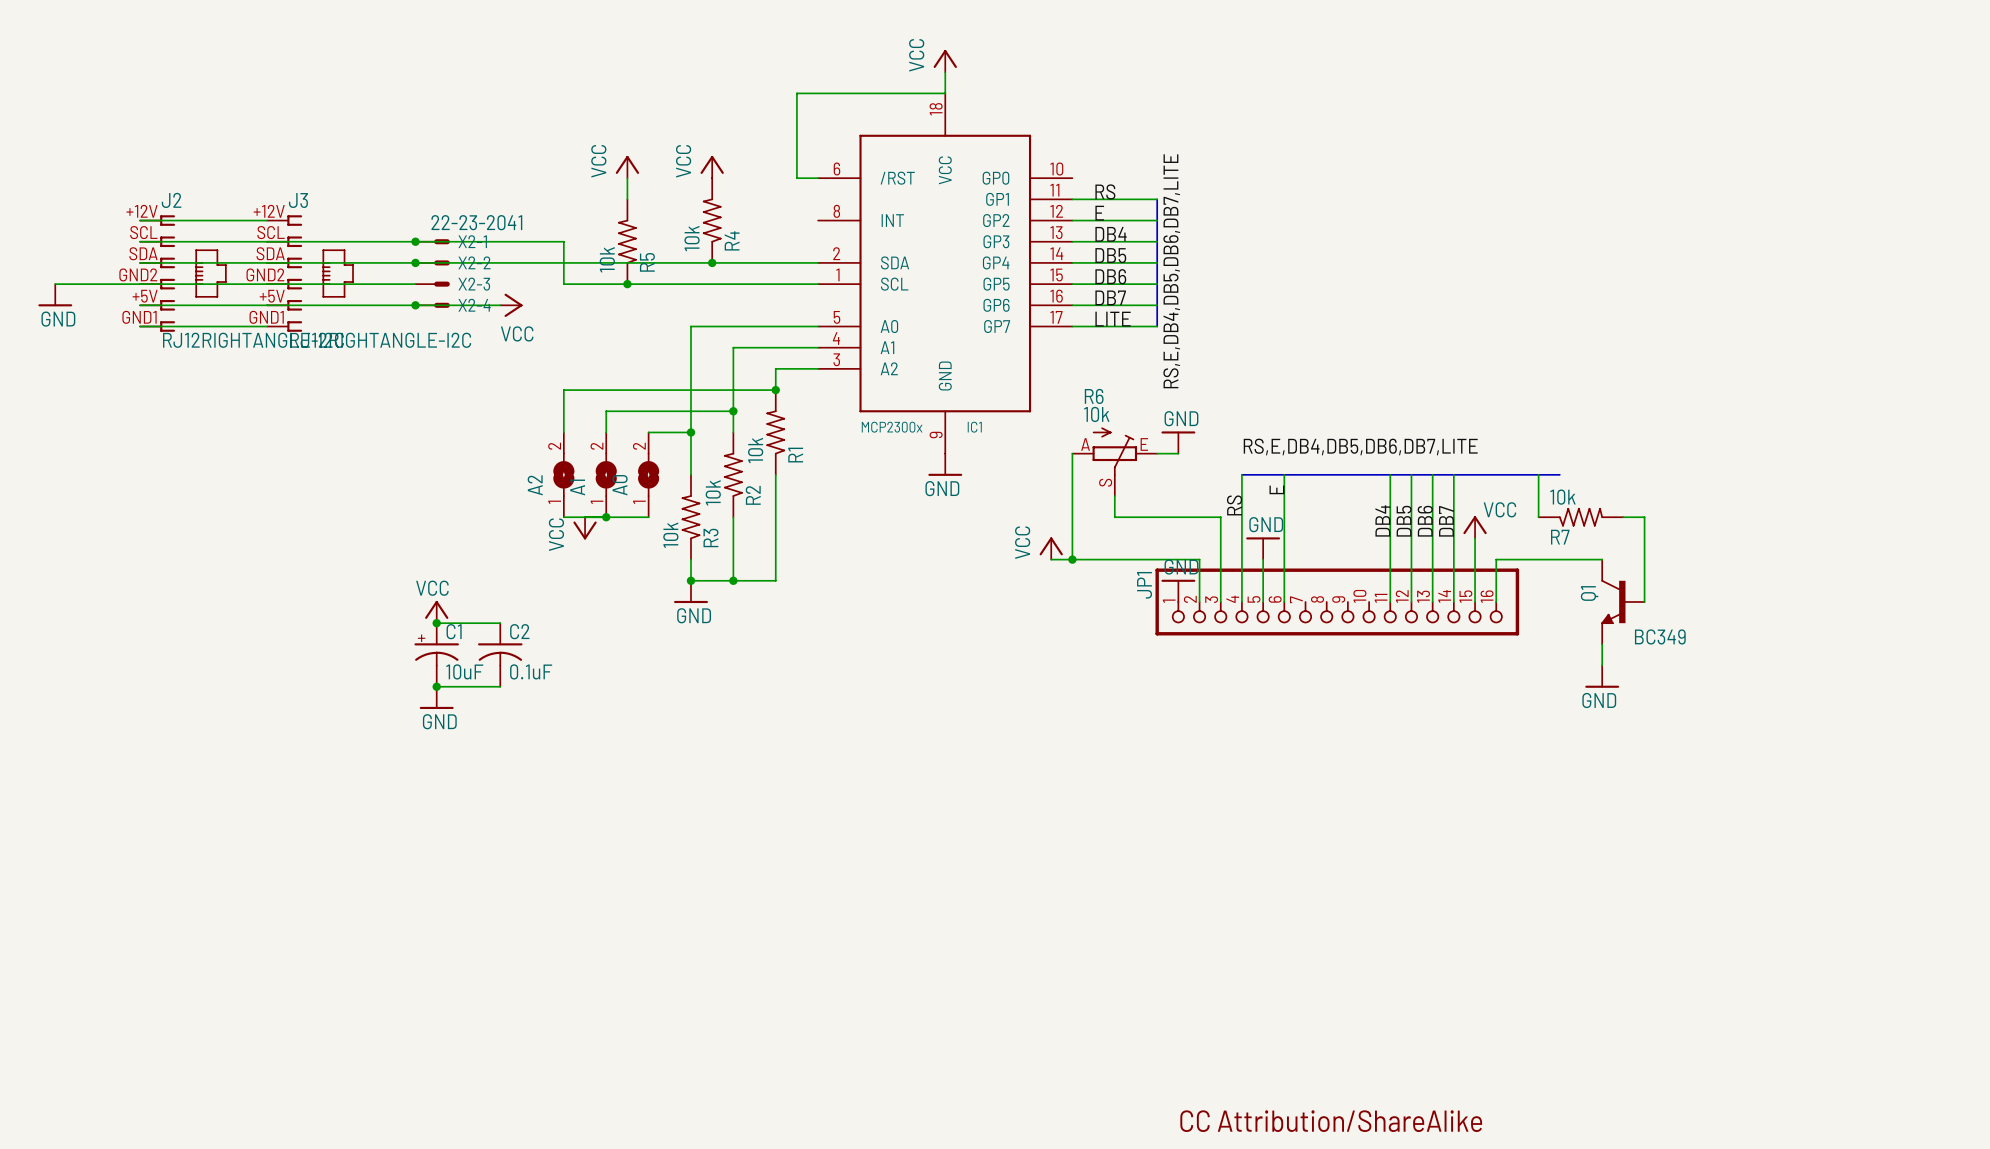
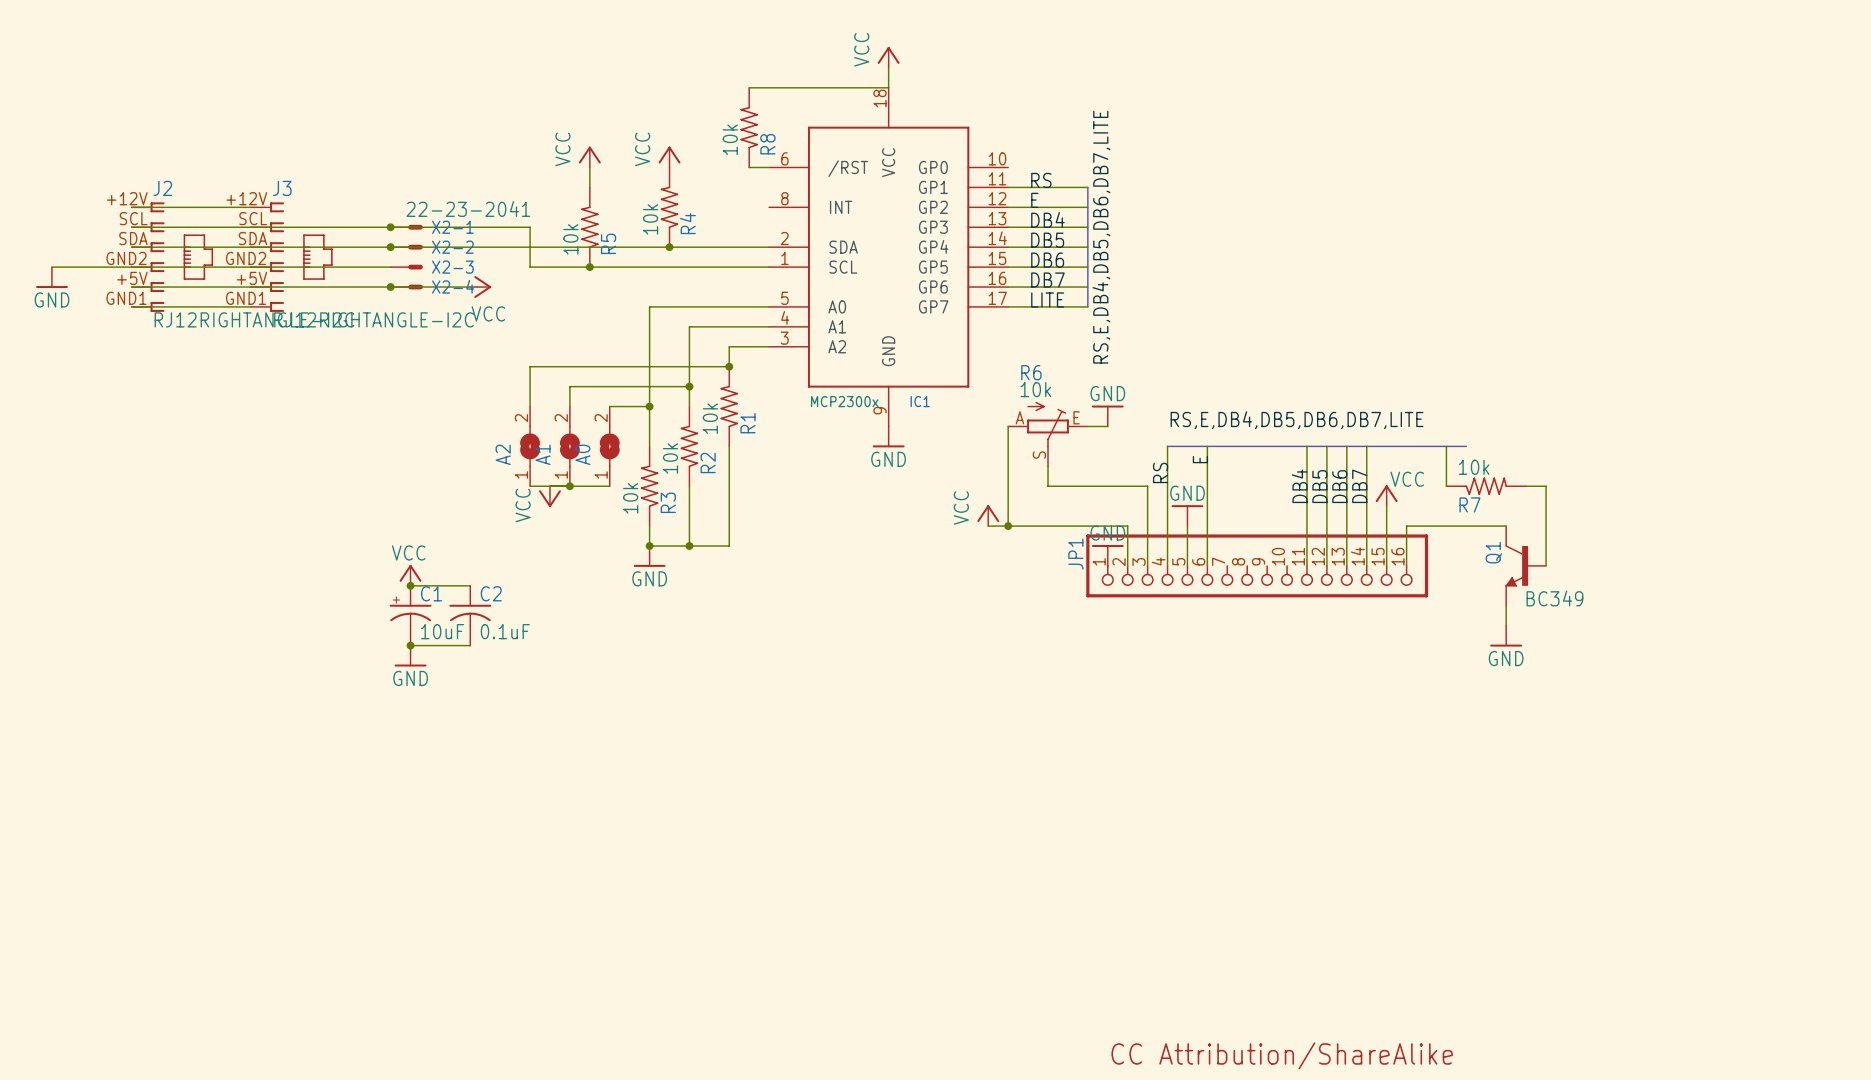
R8: none -> 10k (749, 127)

